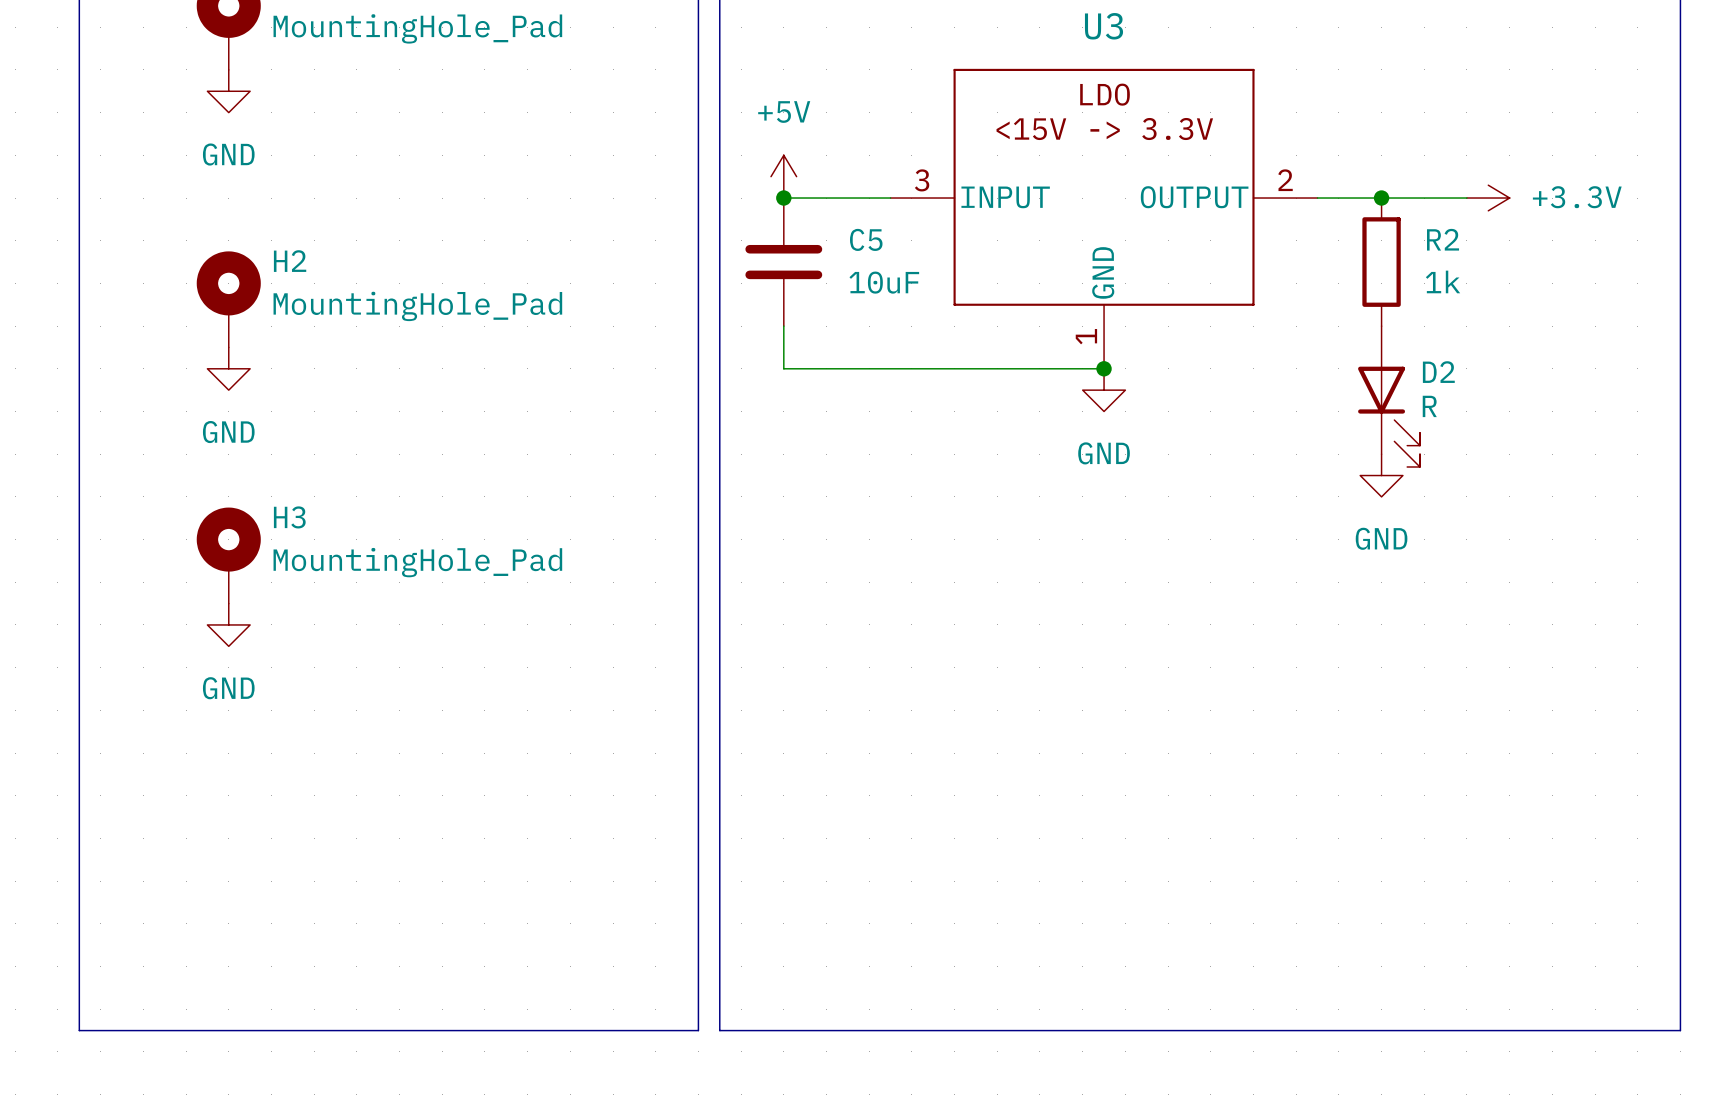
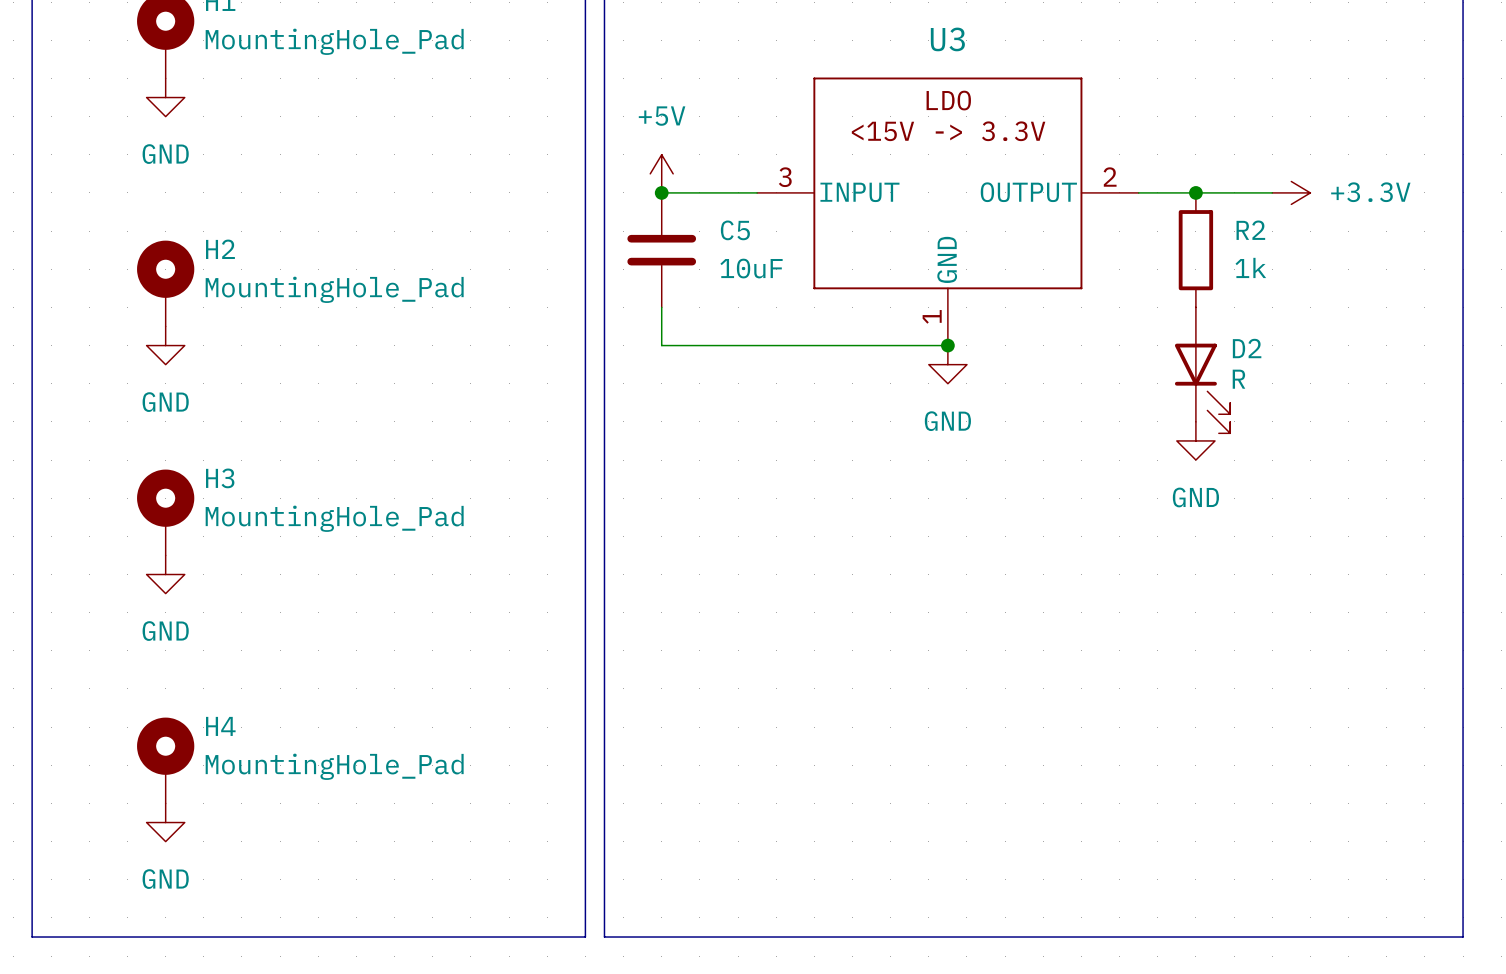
H4: none -> MountingHole_Pad (165, 760)
power symbol: none -> GND (165, 822)

